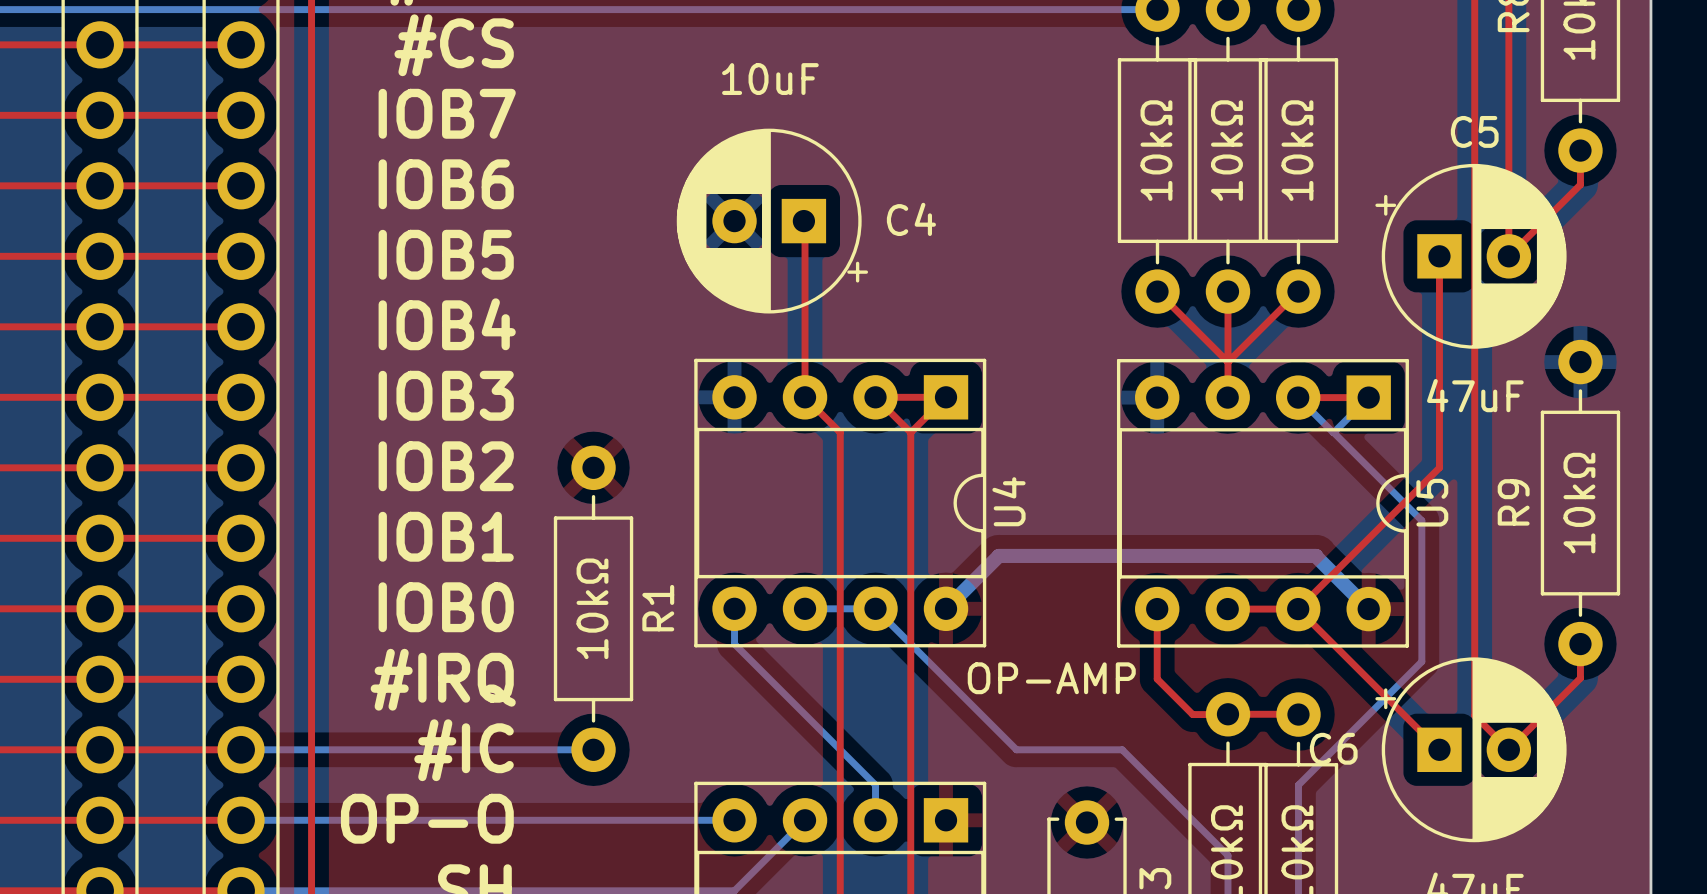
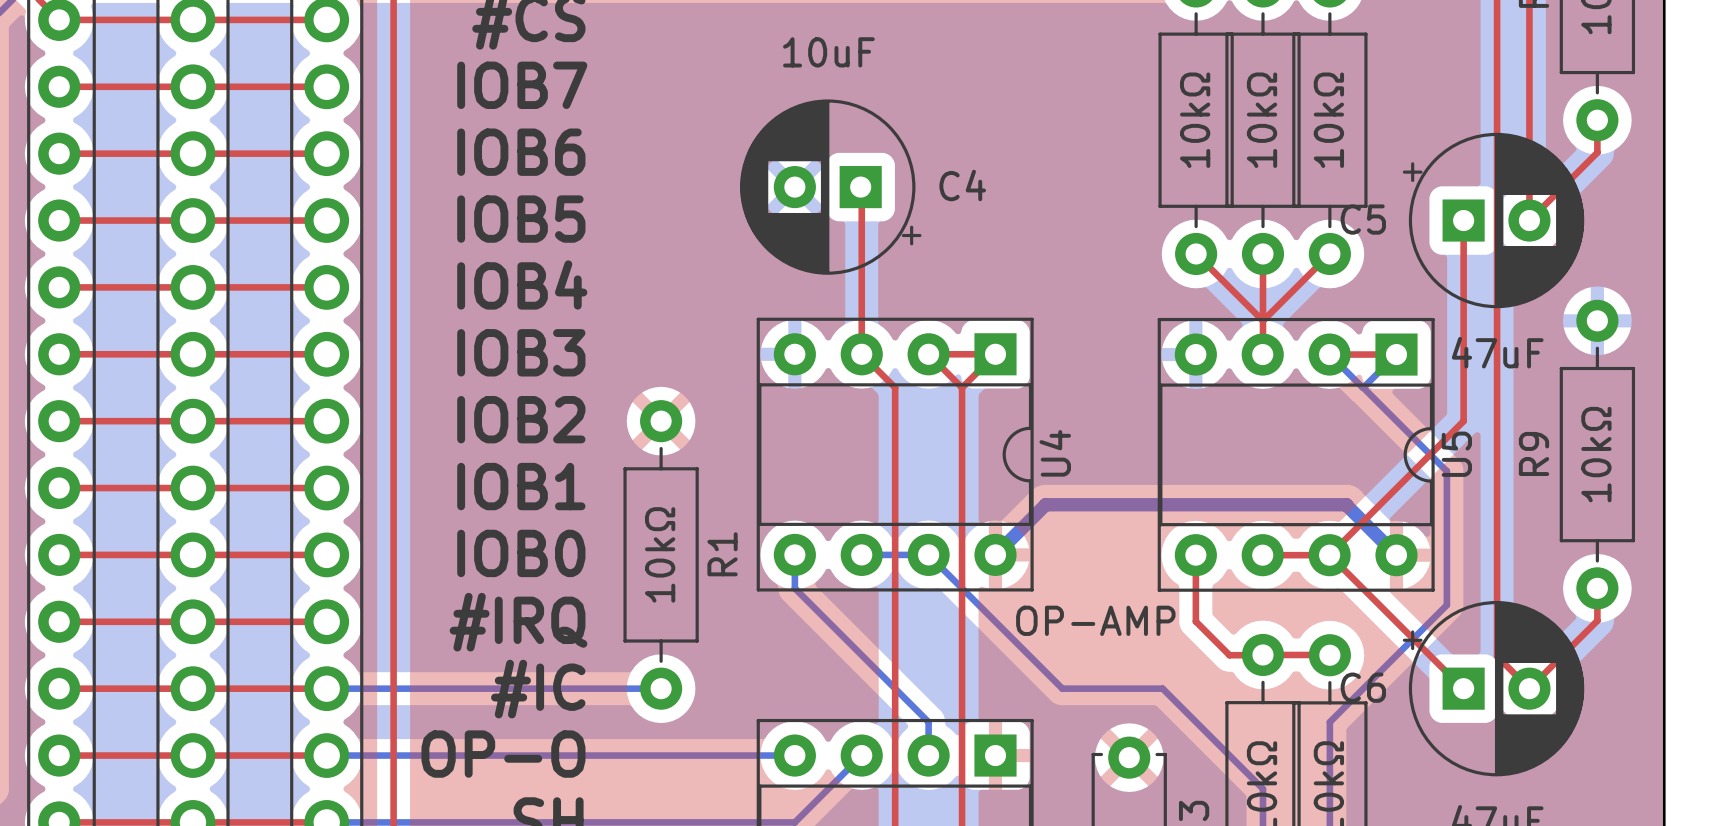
C5 name position: C5 (1474, 131) -> C5 (1363, 219)

